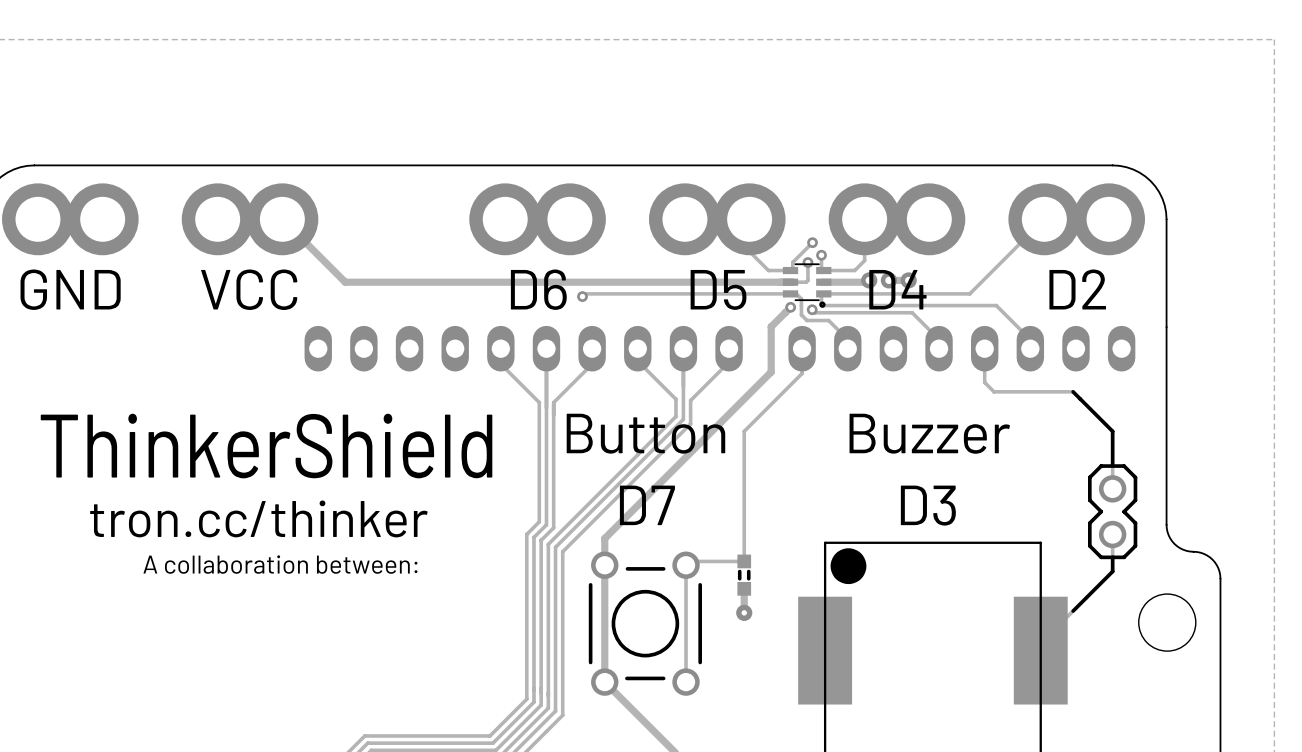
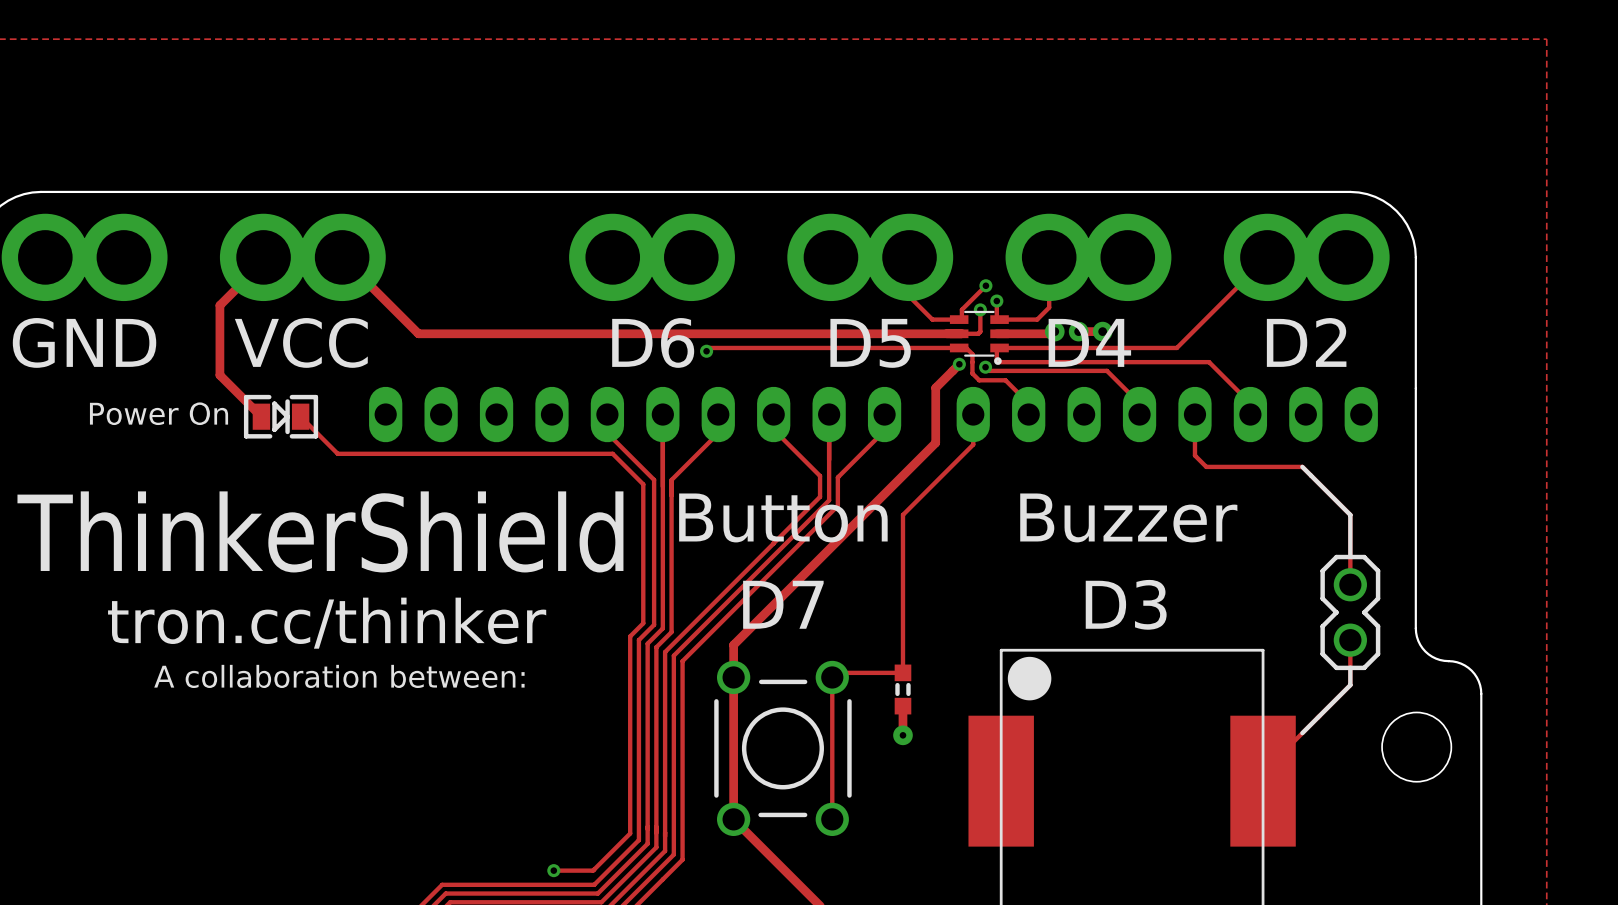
track: none -> (263, 257) (263, 261) (219, 305) (219, 375) (261, 416)
text: none -> Power On (159, 413)
part: none -> (281, 416)
track: none -> (300, 416) (337, 453) (612, 453) (643, 484) (643, 623) (630, 636) (630, 833) (593, 870) (553, 870)
via: none -> (553, 870)

